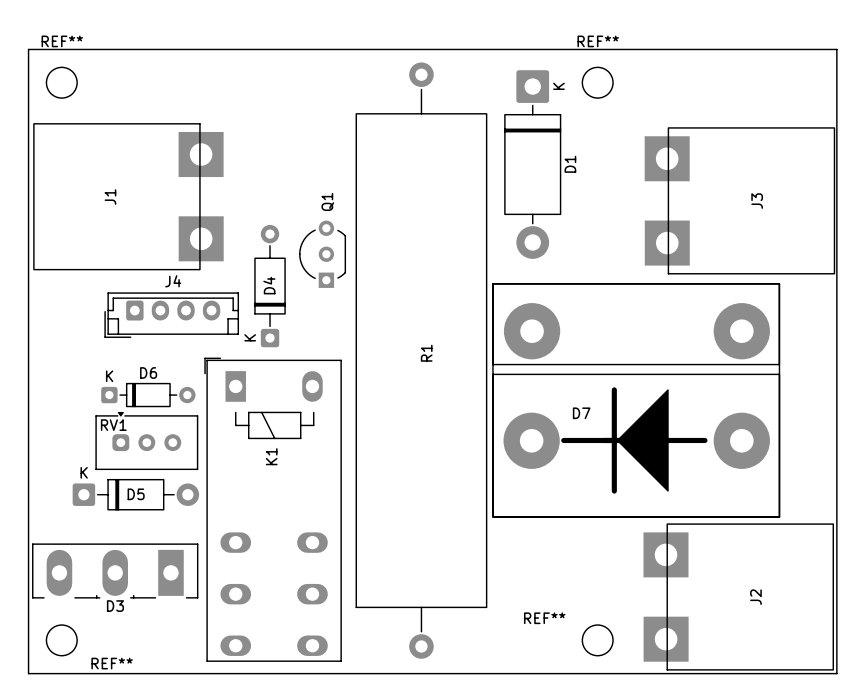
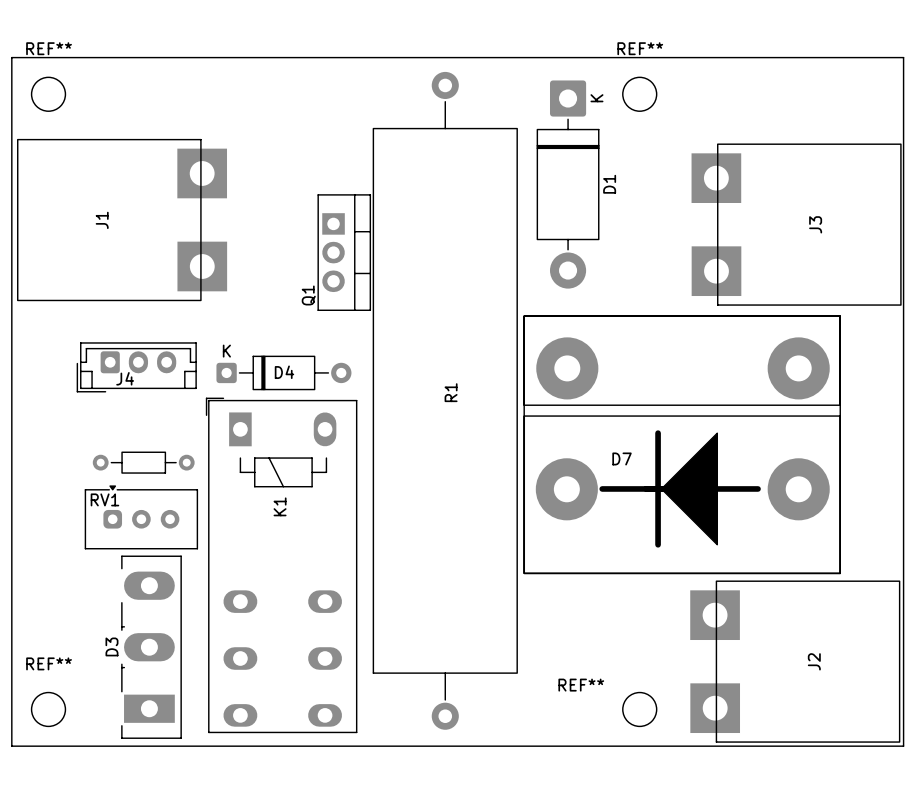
Q1 name position: Q1 (327, 201) -> Q1 (308, 295)
Q1 footprint: [299, 220, 346, 288] -> [317, 194, 372, 311]
J4 name position: J4 (173, 281) -> J4 (125, 378)
D4 rotation: 0° (270, 286) -> 90° clockwise (283, 372)
J4 footprint: [104, 292, 239, 338] -> [76, 342, 197, 393]
D6: (148, 395) -> none
part: none -> (143, 462)
RV1 position: (146, 440) -> (141, 517)
D5: (135, 494) -> none
D3 rotation: 0° (115, 570) -> 90° clockwise (151, 647)
REF** name position: REF** (112, 663) -> REF** (49, 663)

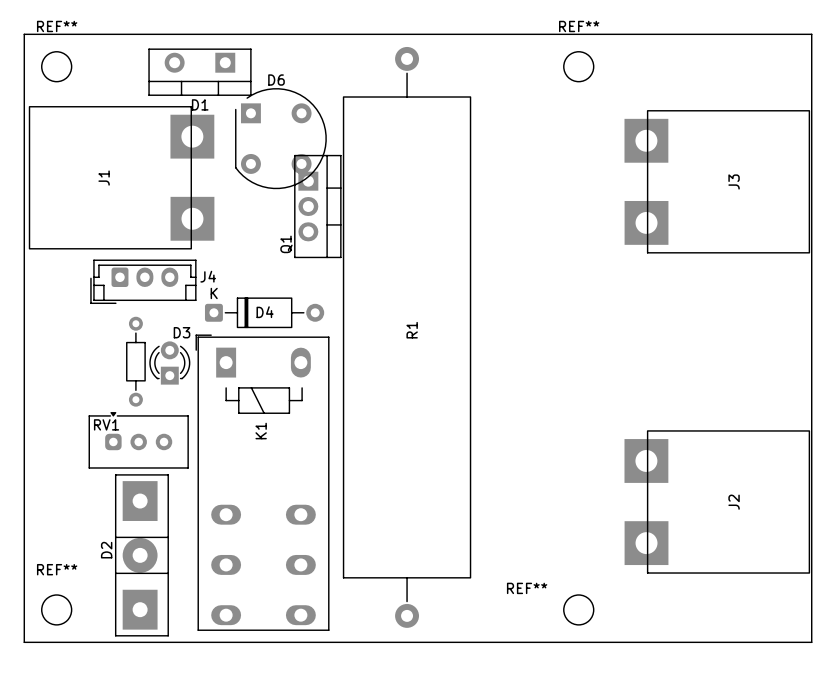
D1 footprint: [536, 80, 600, 289] -> [148, 48, 252, 96]
D6: none -> (280, 138)
D1 name position: D1 (609, 184) -> D1 (200, 104)
J4 position: (136, 367) -> (143, 281)
J4 name position: J4 (125, 378) -> J4 (208, 276)
D7: (682, 444) -> none
part rotation: 0° (143, 462) -> 90° clockwise (135, 361)
D3 footprint: [121, 555, 182, 739] -> [149, 341, 191, 385]
D3 name position: D3 (111, 646) -> D3 (182, 332)
D2: none -> (141, 555)
J2 position: (795, 661) -> (717, 501)

